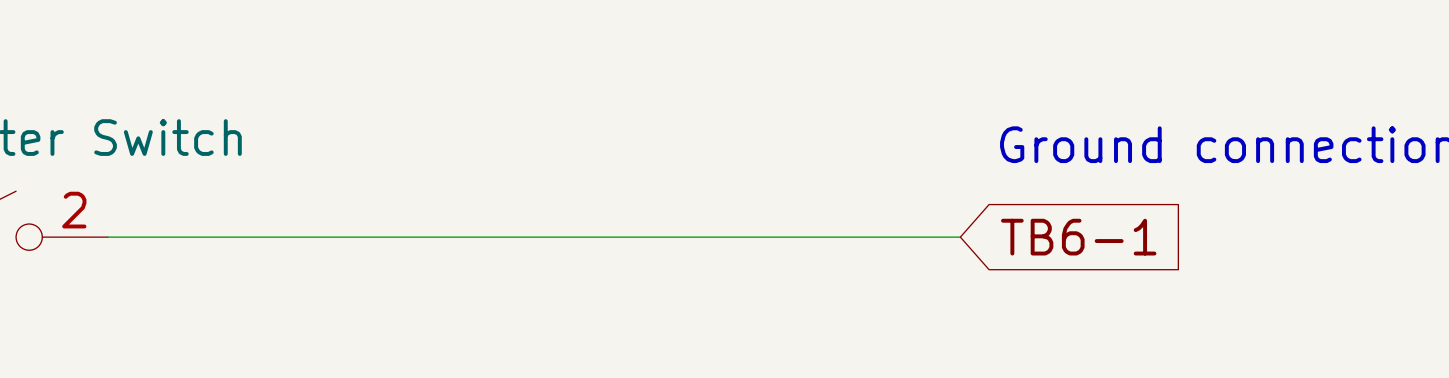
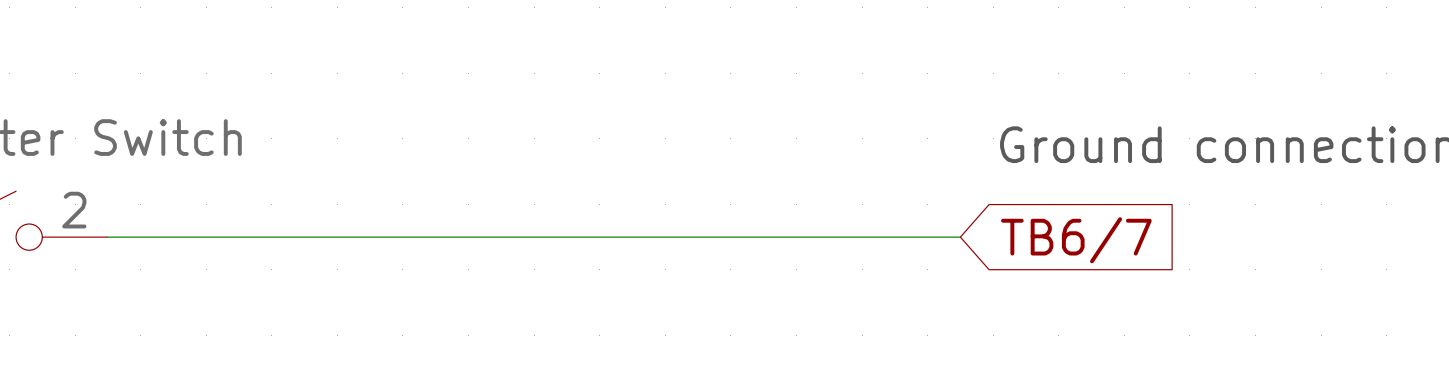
global label: TB6-1 (1078, 237) -> TB6/7 (1076, 240)

